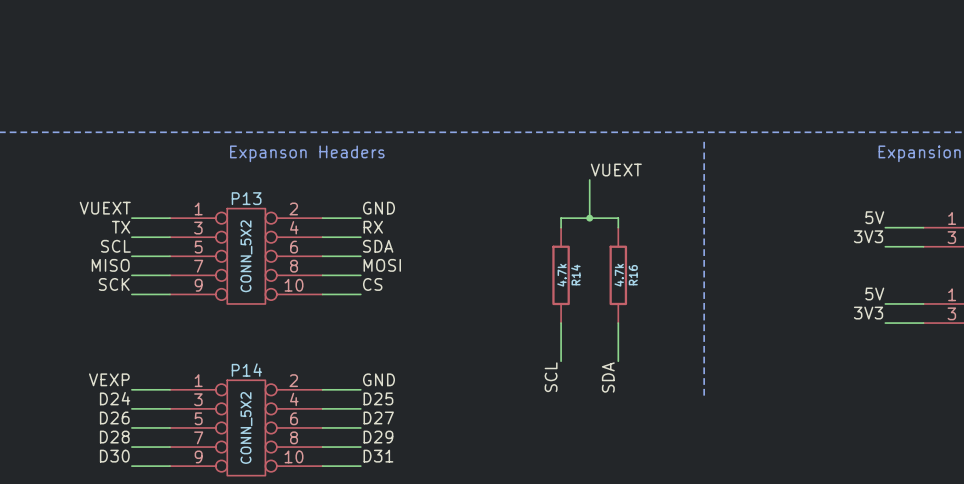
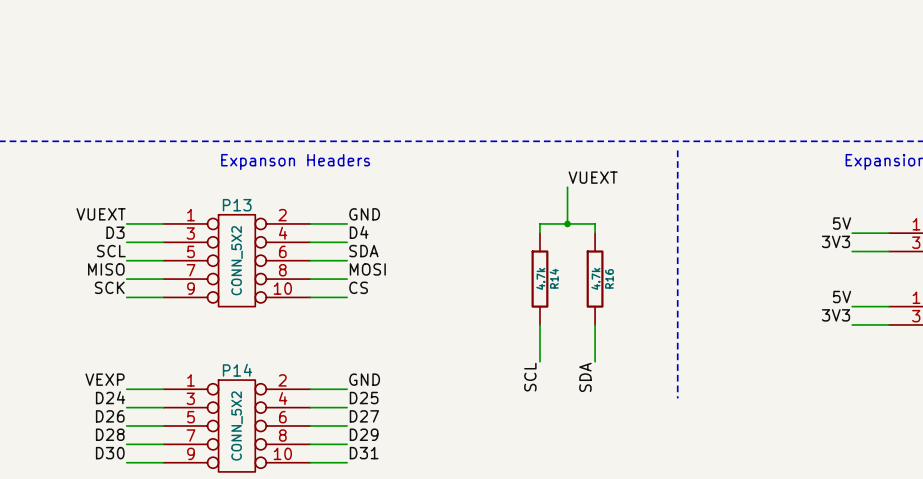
label: TX (121, 227) -> D3 (115, 232)
label: RX (373, 227) -> D4 (359, 232)

